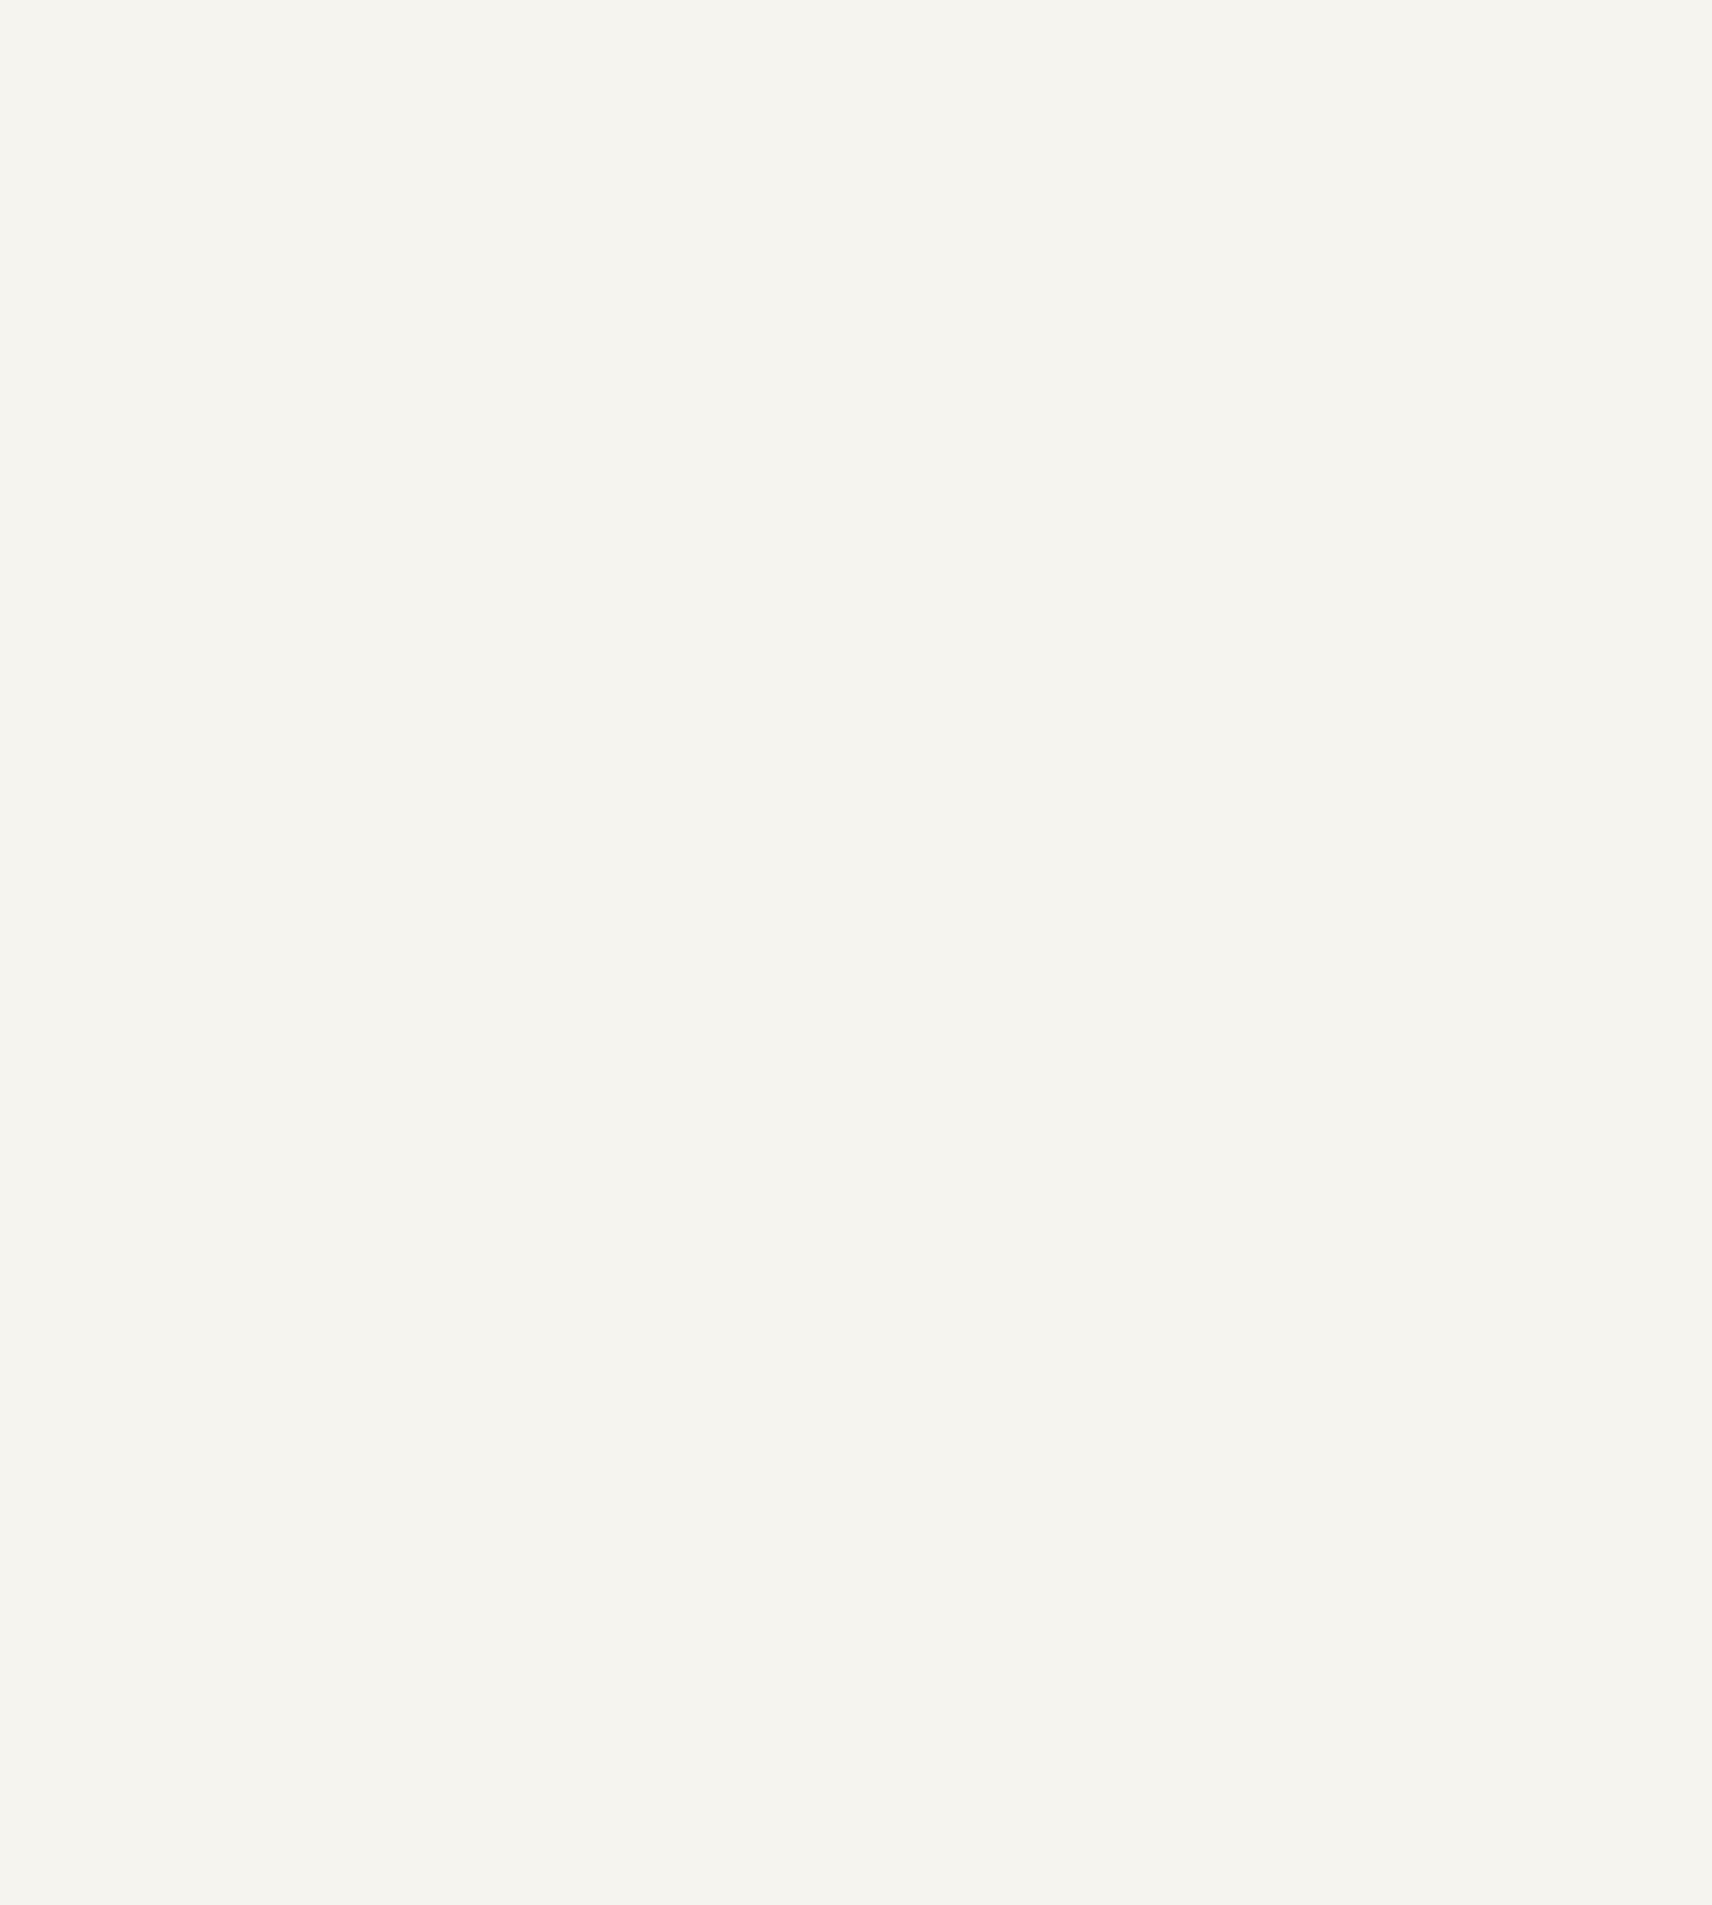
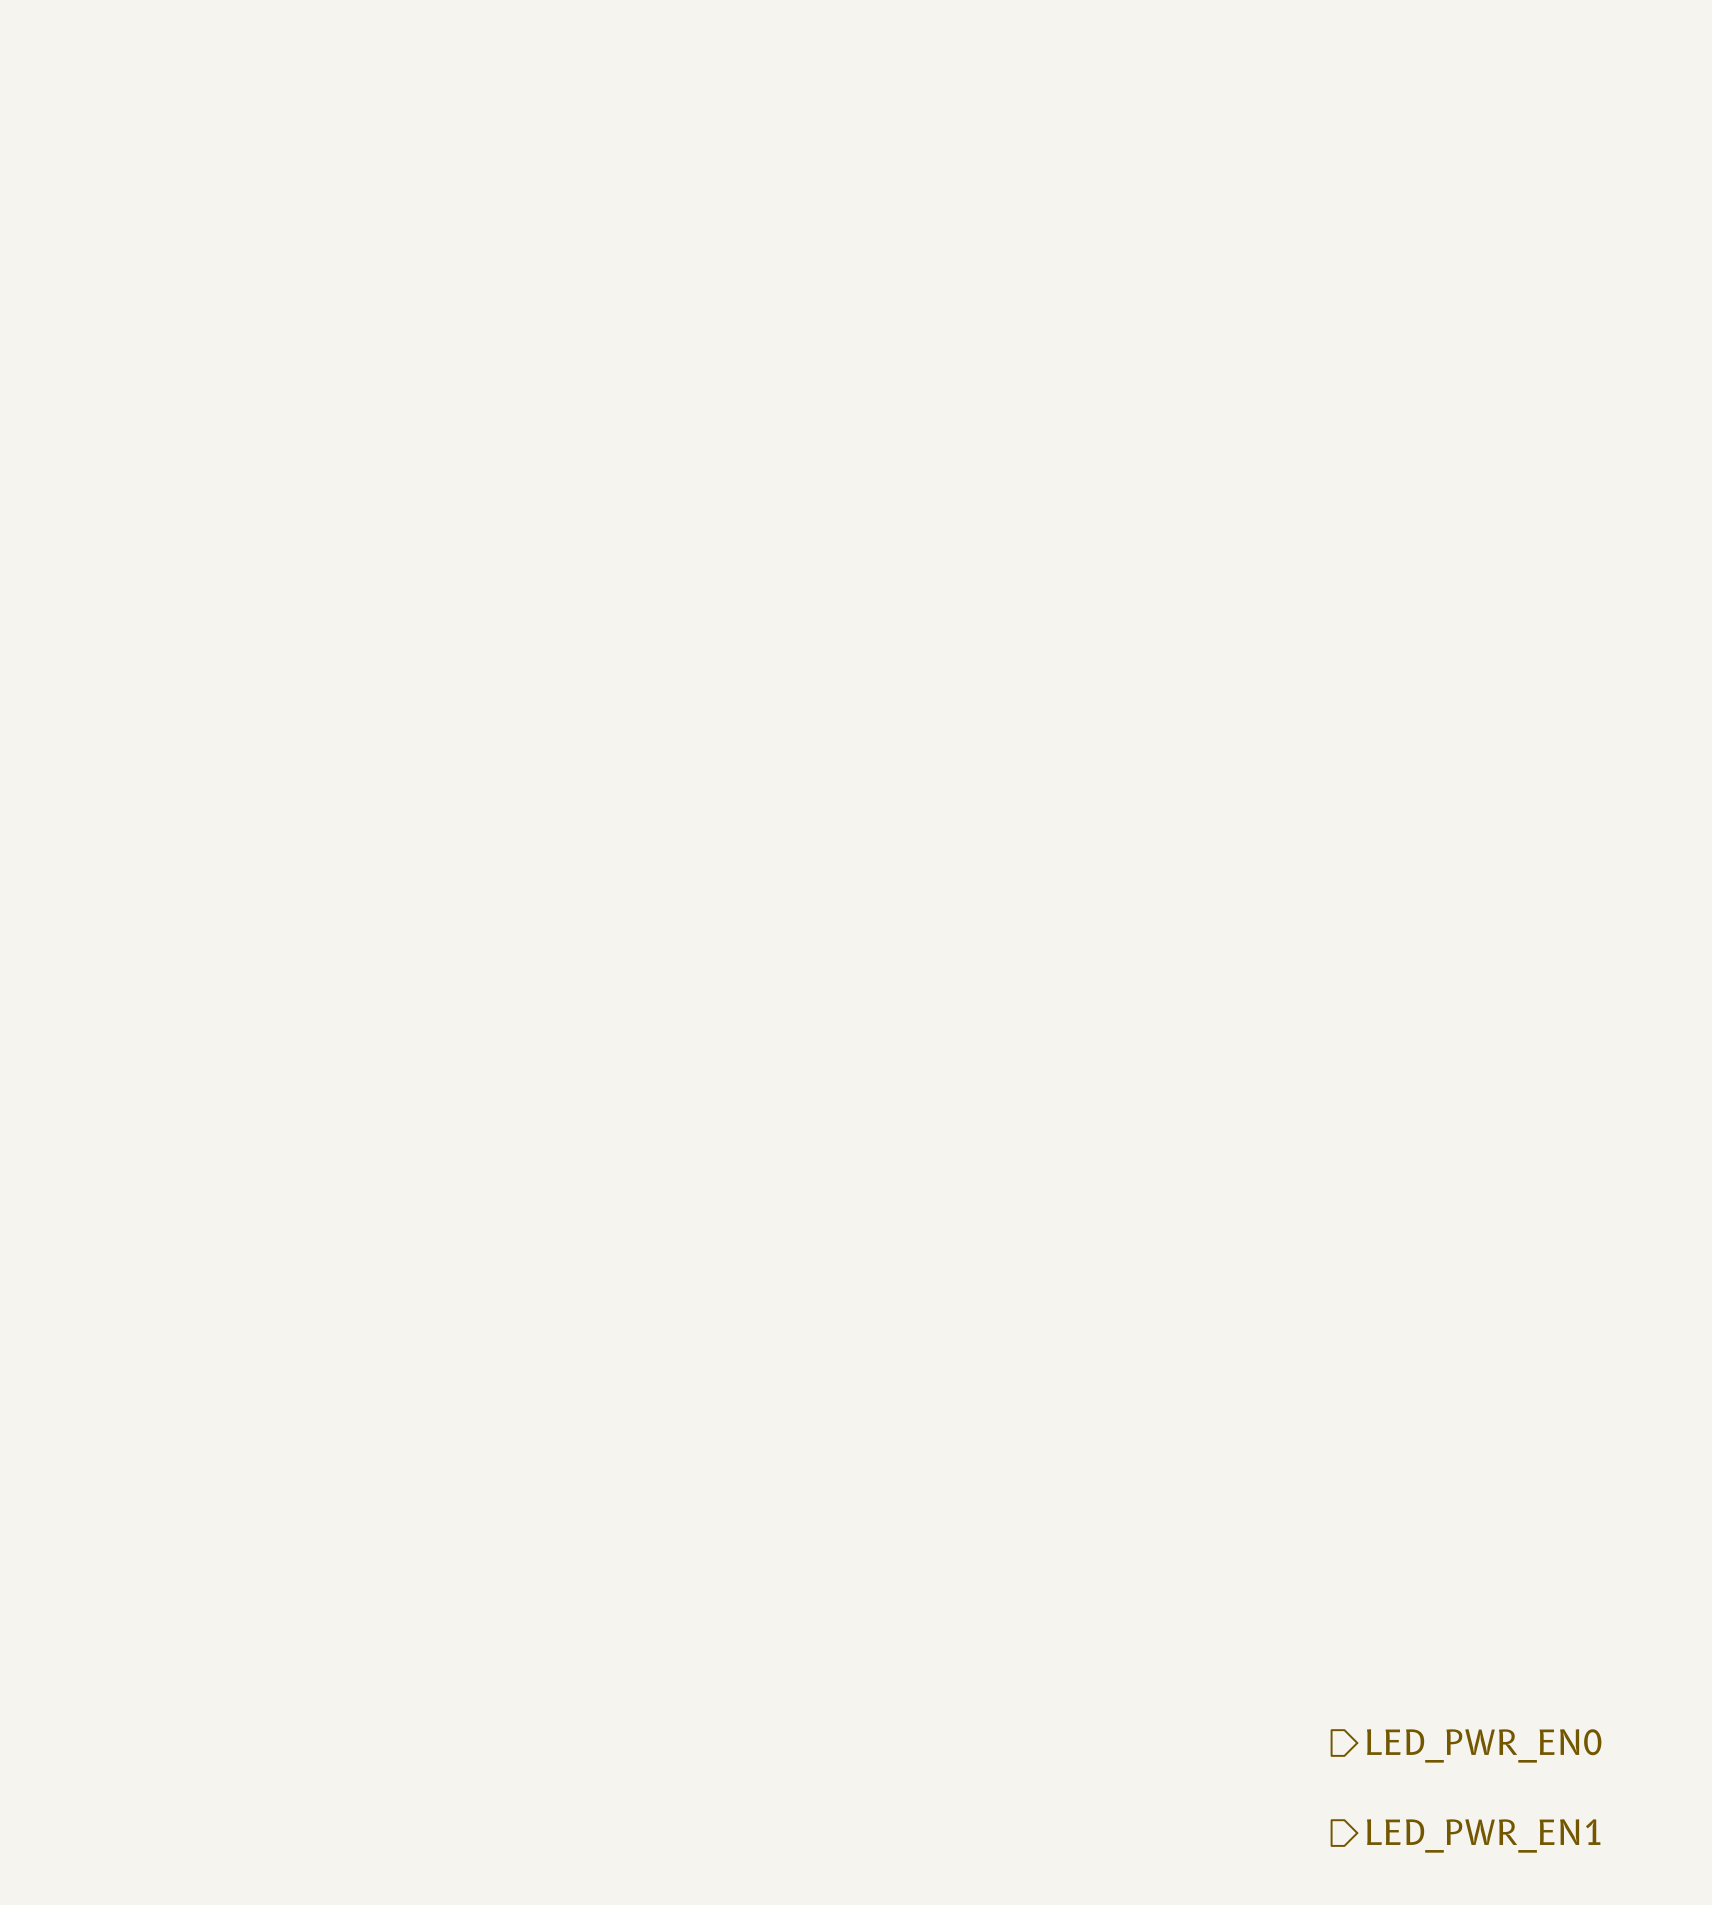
hierarchical label: none -> LED_PWR_EN0 (1484, 1745)
hierarchical label: none -> LED_PWR_EN1 (1483, 1835)

